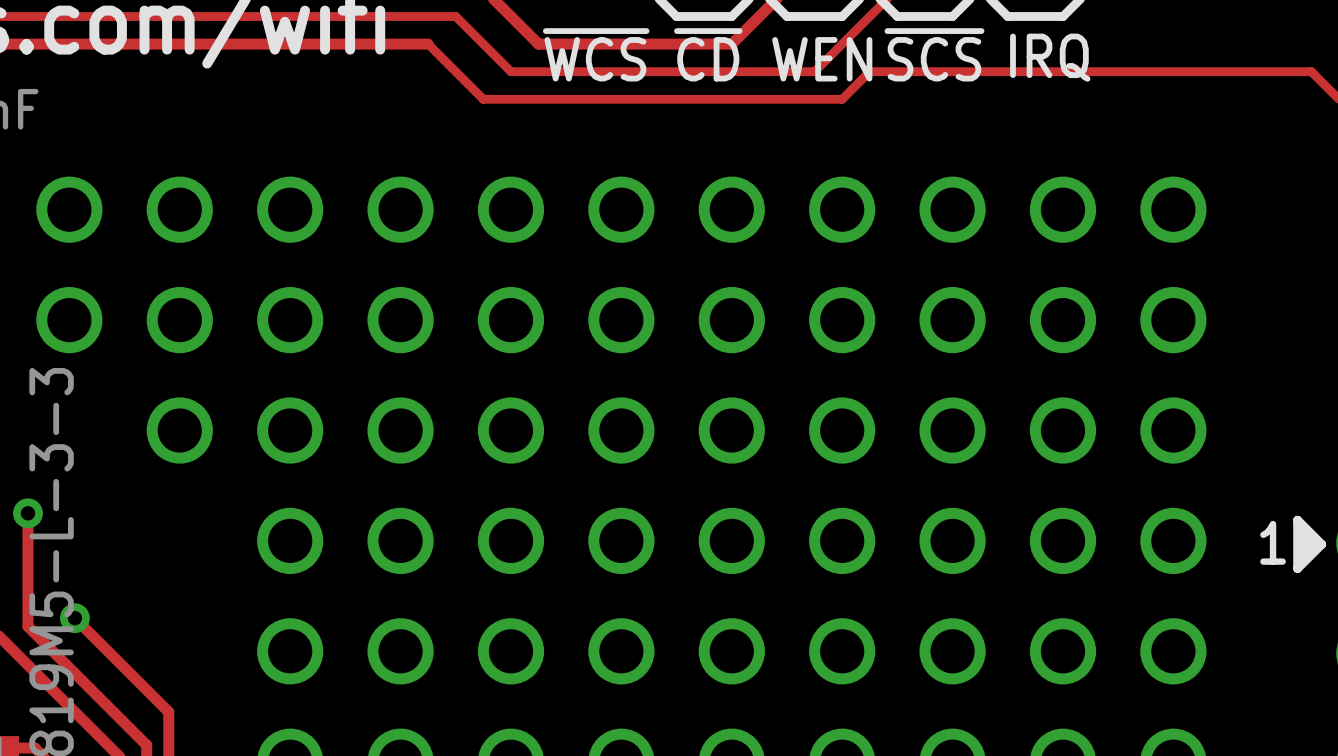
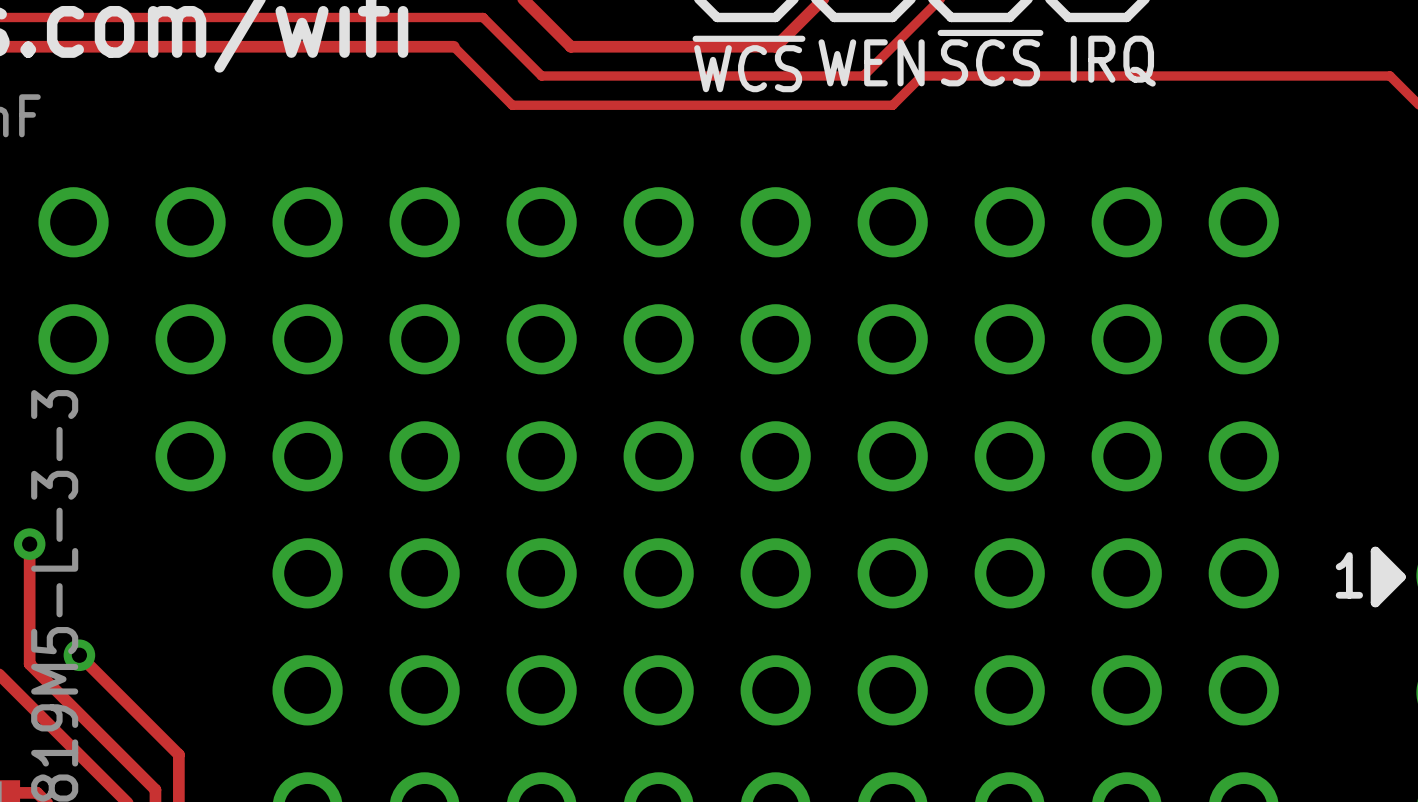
text position: ~{WCS} (596, 54) -> ~{WCS} (749, 63)
text: ~{CD} (708, 54) -> none

